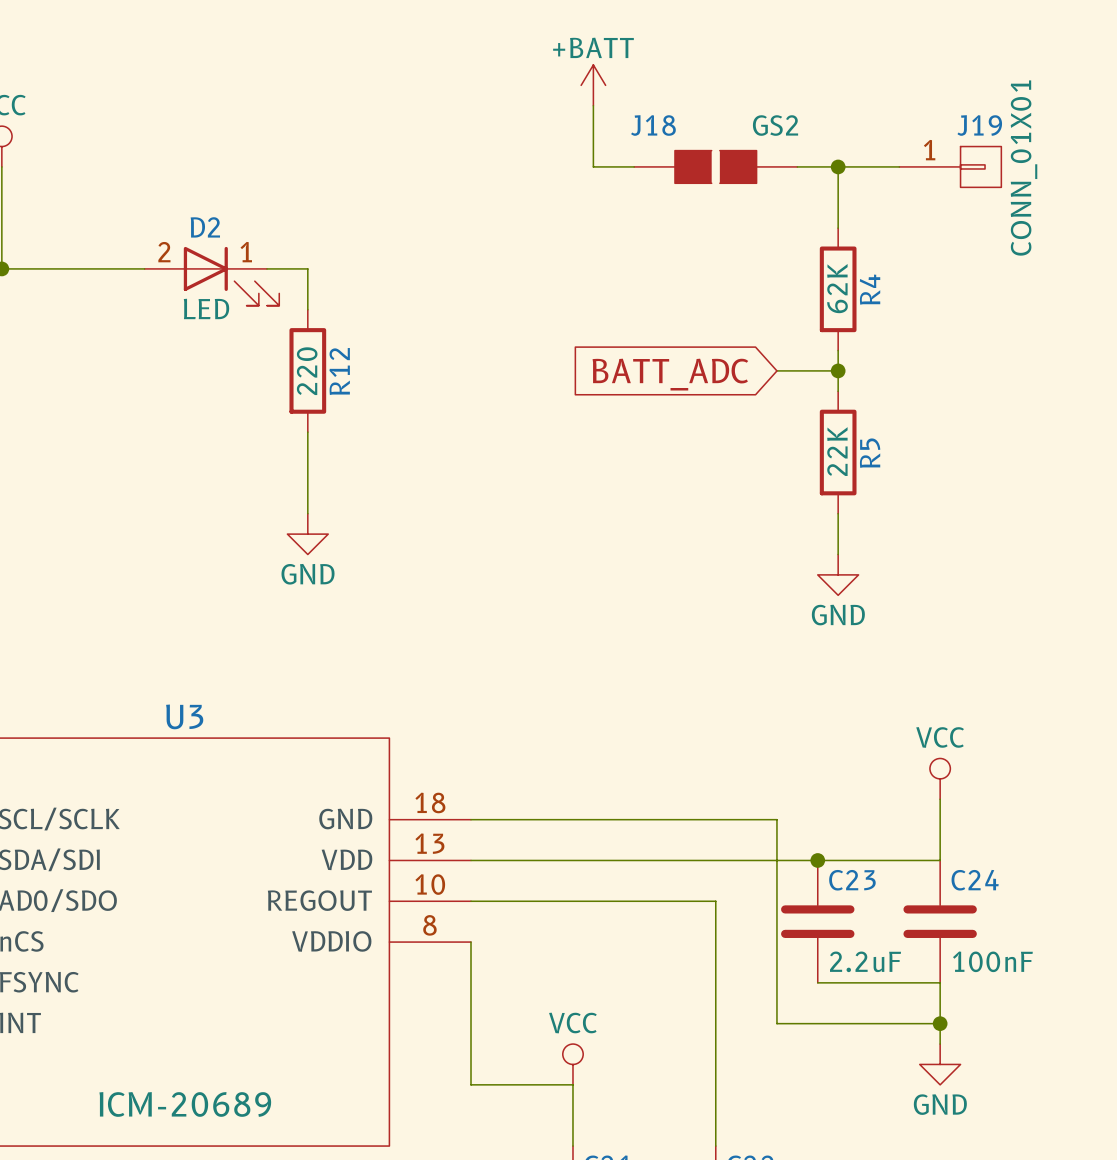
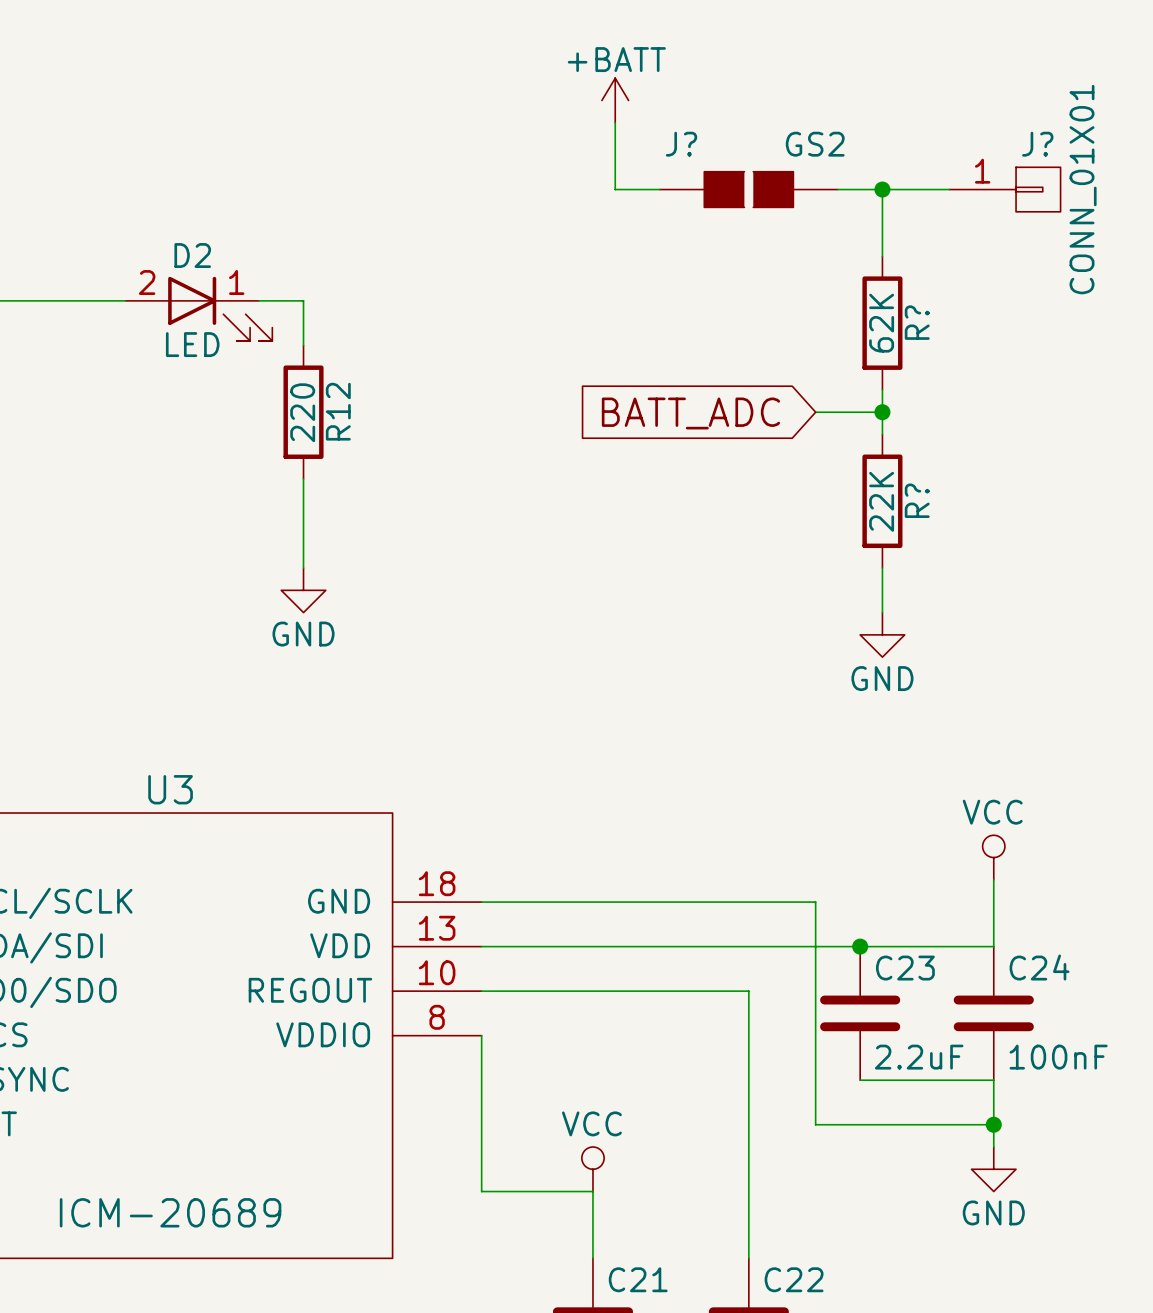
J18 name: J18 (653, 125) -> J? (681, 144)
J19 name: J19 (979, 125) -> J? (1037, 144)
R4 name: R4 (870, 289) -> R? (917, 322)
R5 name: R5 (870, 453) -> R? (917, 500)

